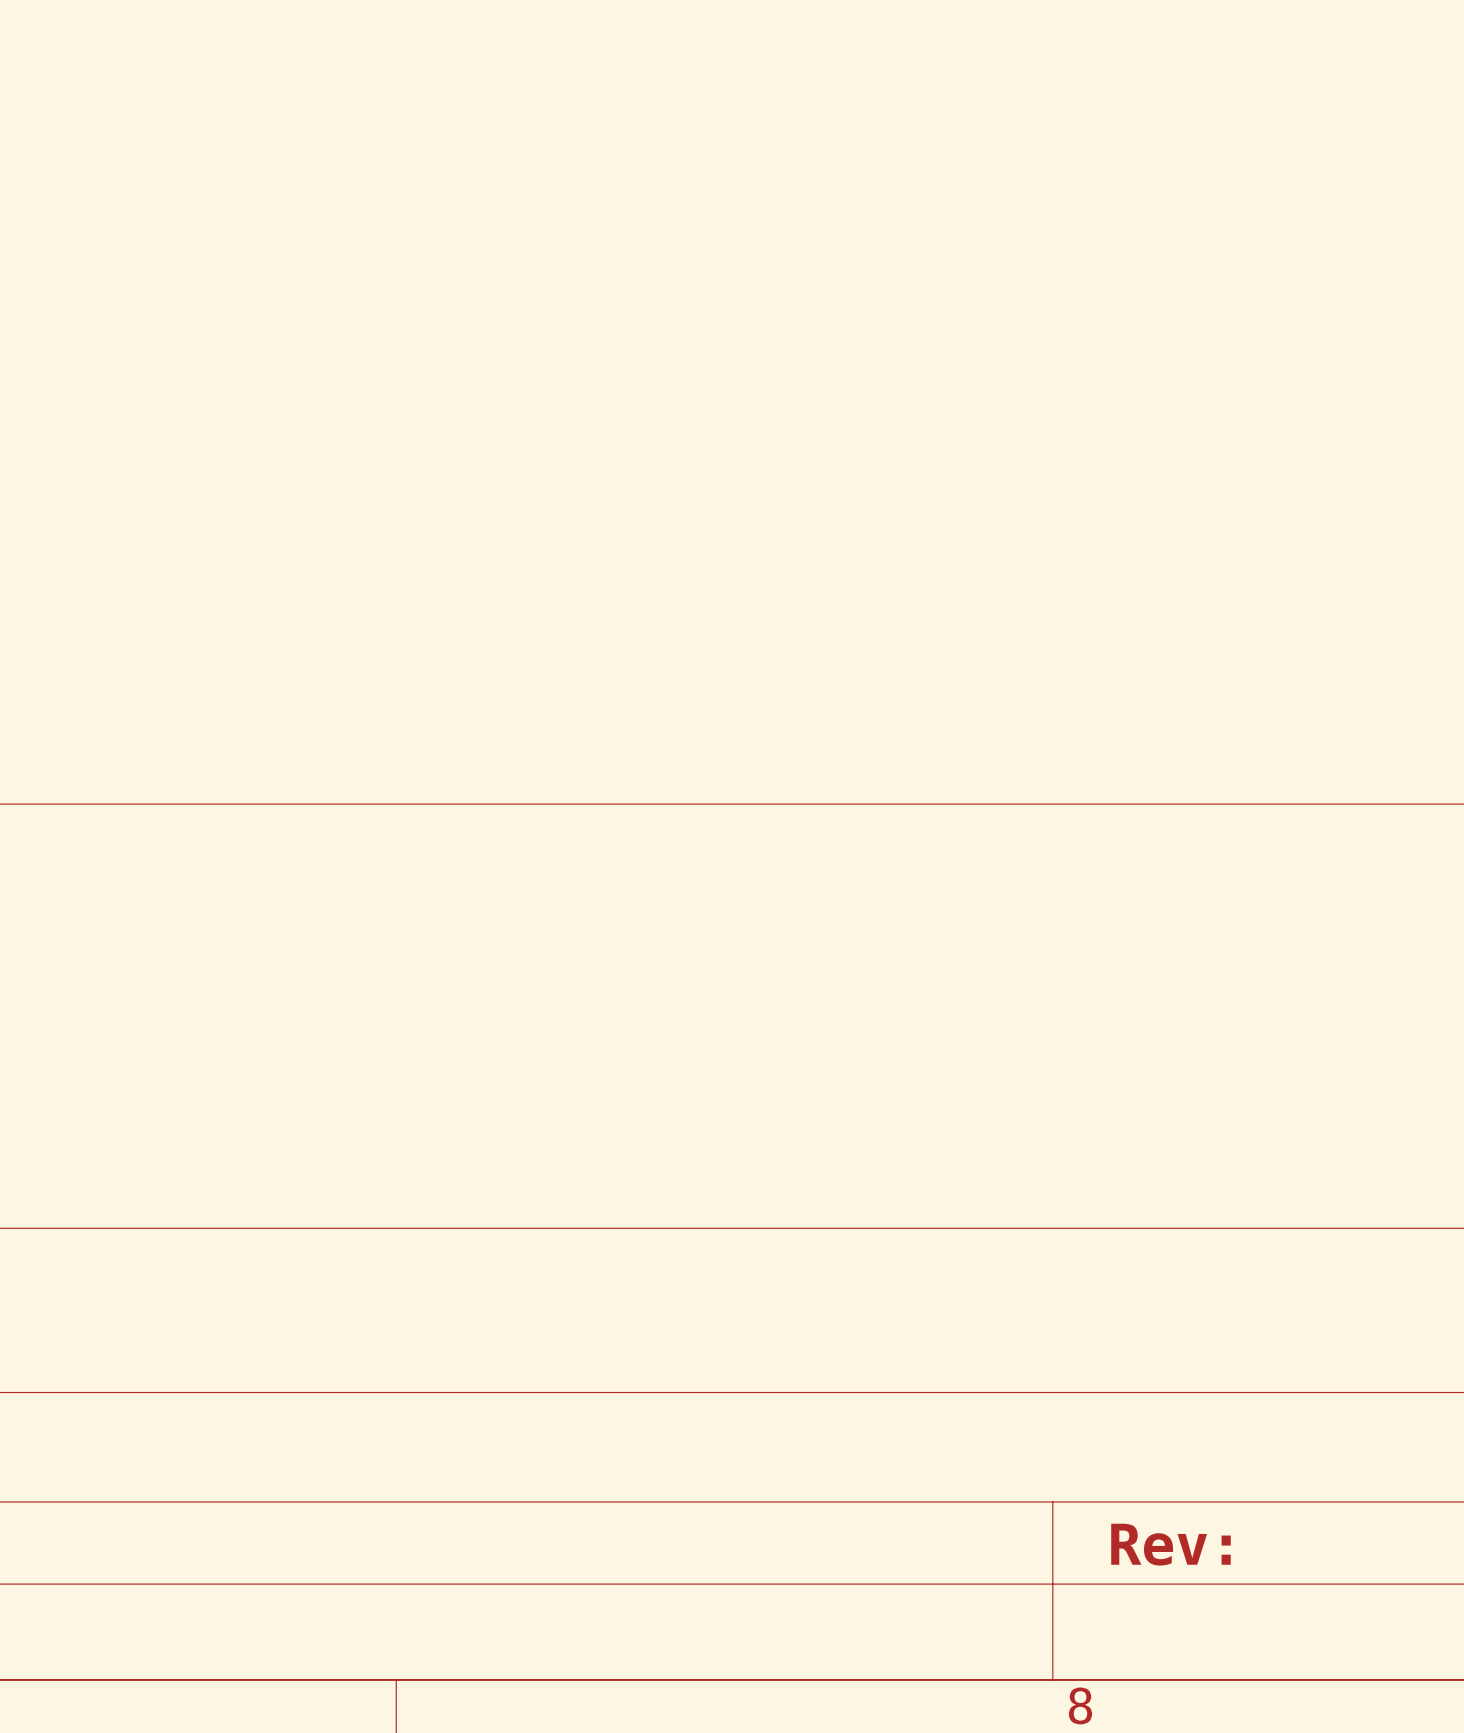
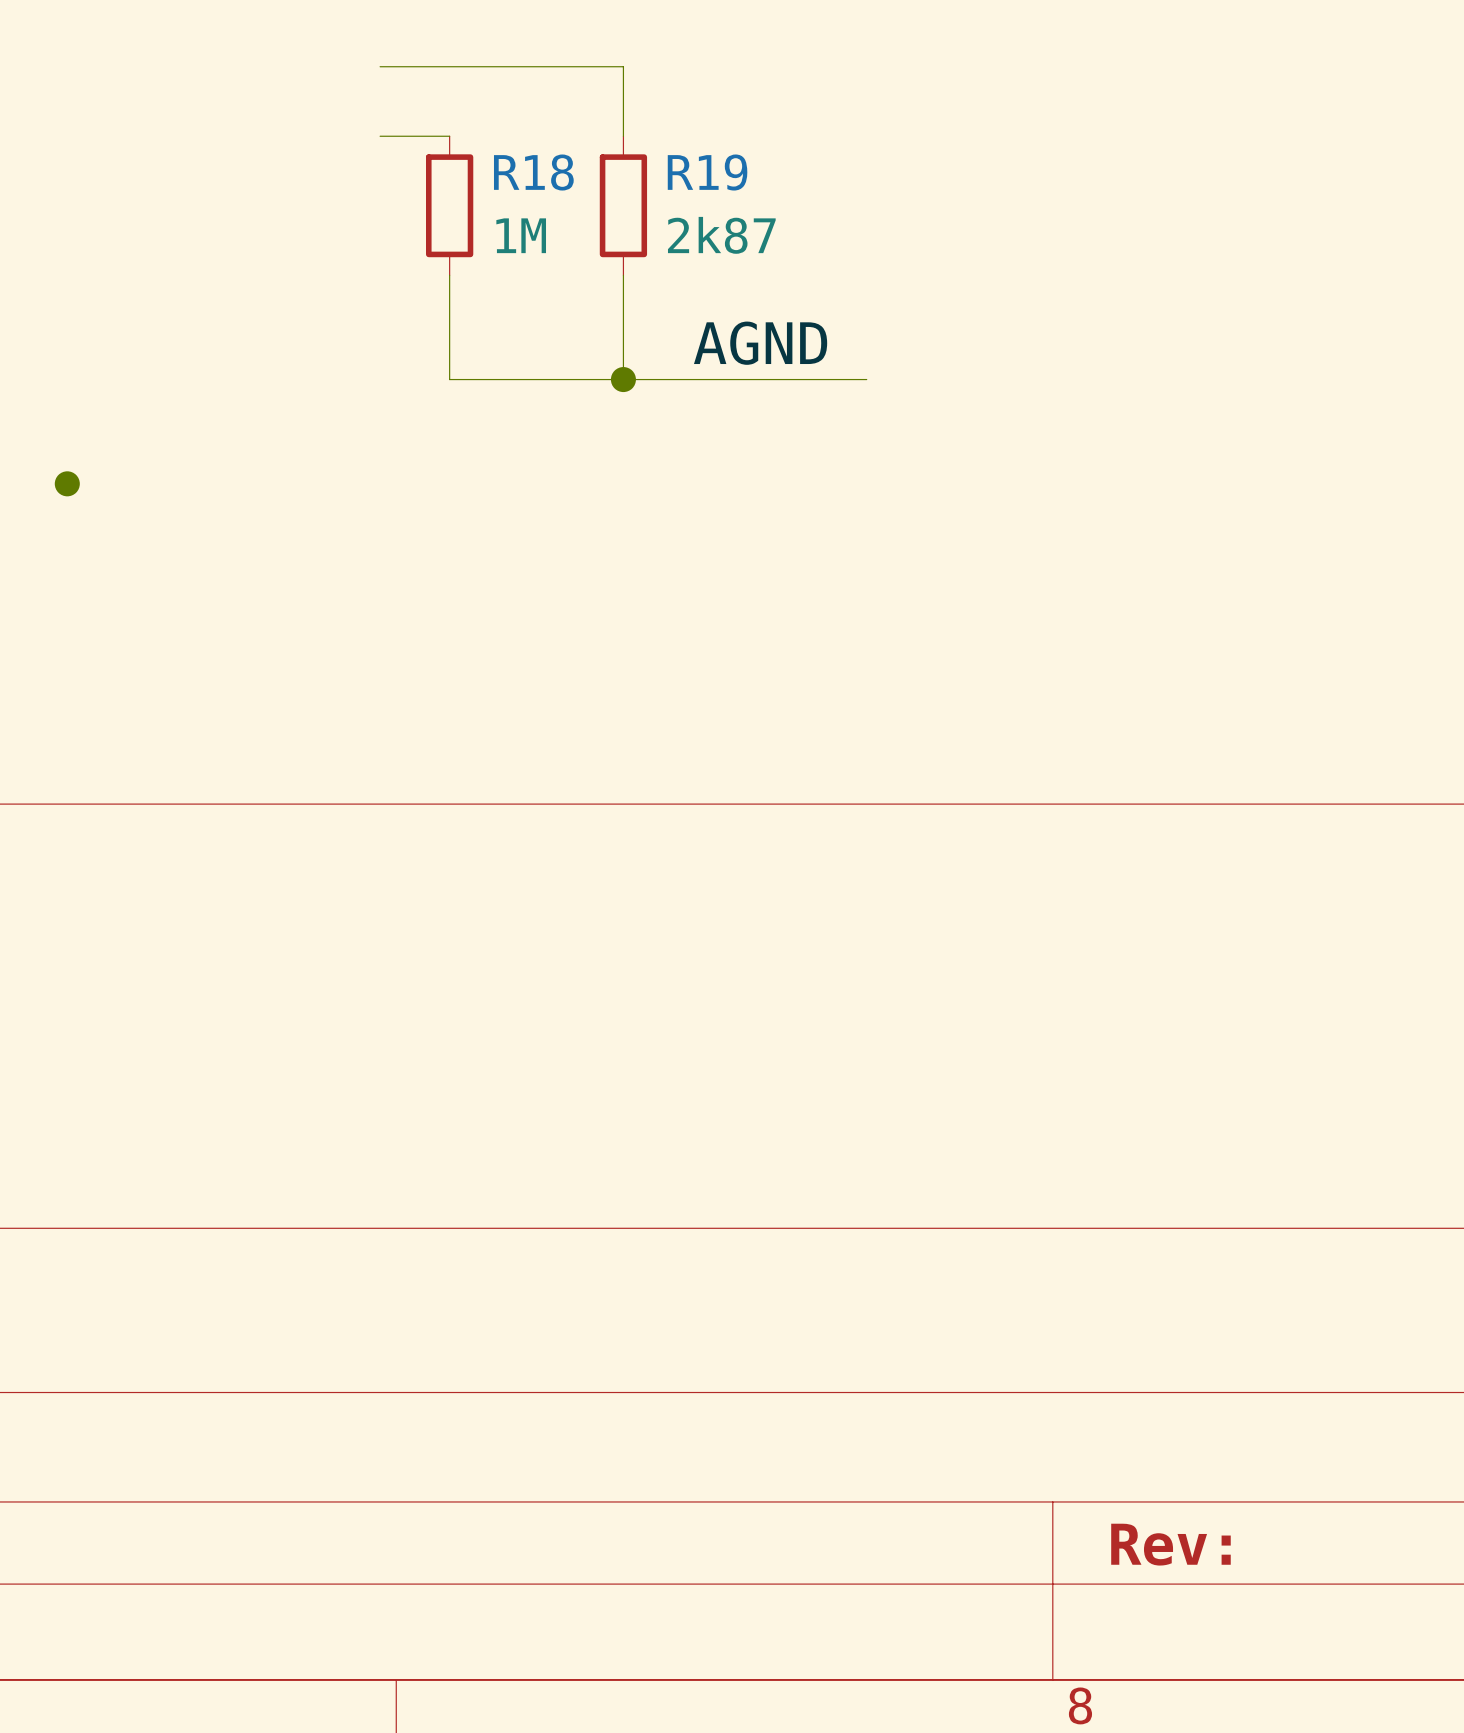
wire: none -> (380, 66) (623, 66) (623, 136)
wire: none -> (380, 136) (449, 136)
R18: none -> 1M (449, 205)
R19: none -> 2k87 (623, 205)
wire: none -> (449, 275) (449, 379) (866, 379)
wire: none -> (623, 275) (623, 379)
label: none -> AGND (760, 343)
junction: none -> (623, 379)
junction: none -> (67, 483)

